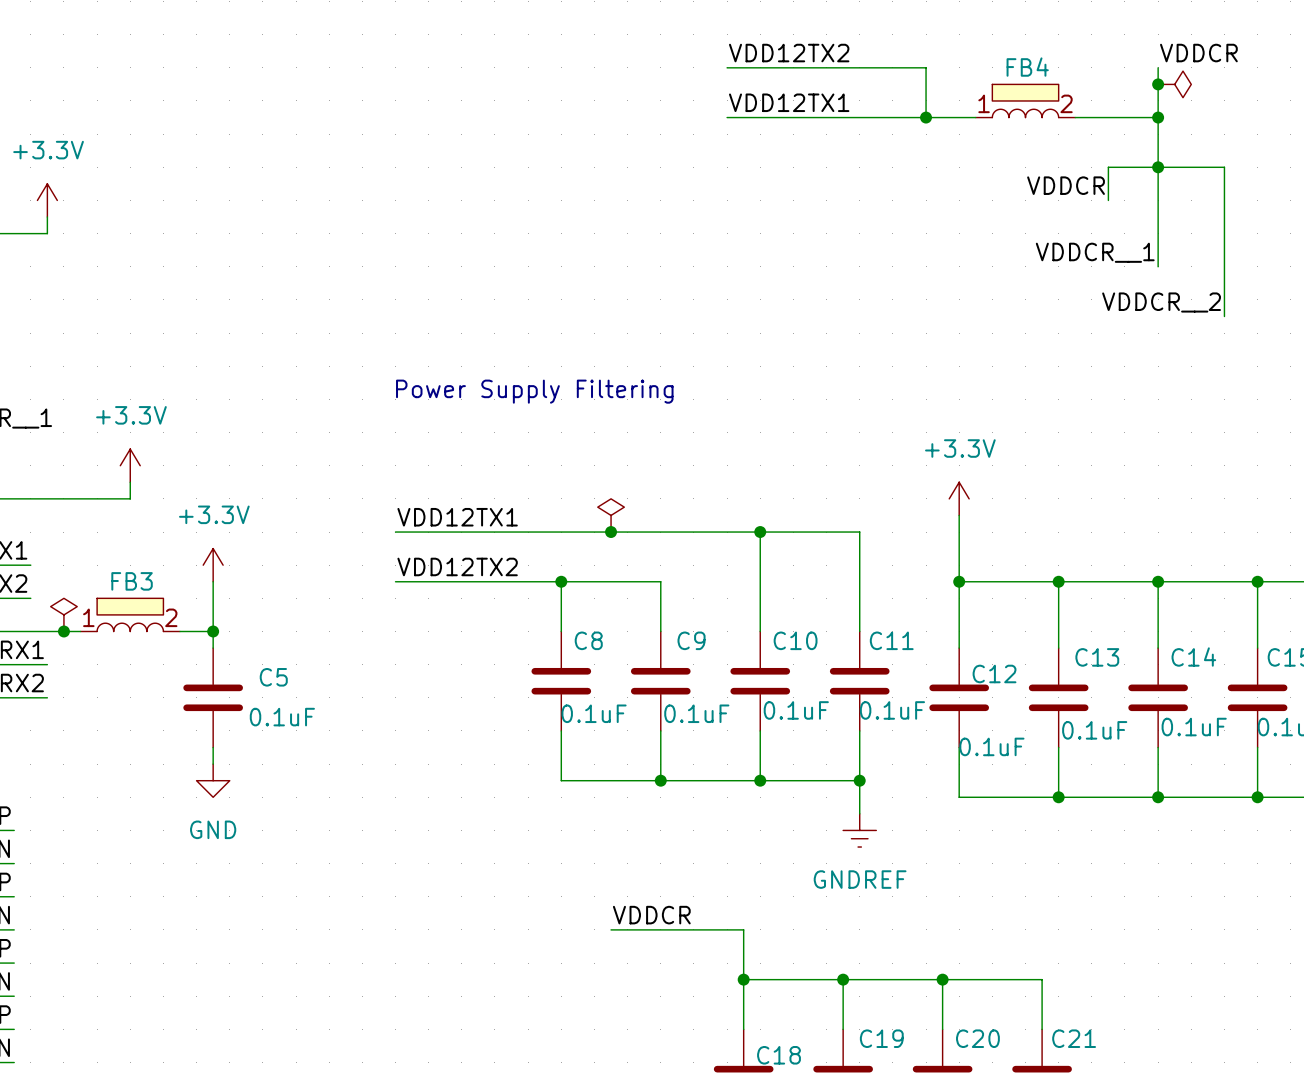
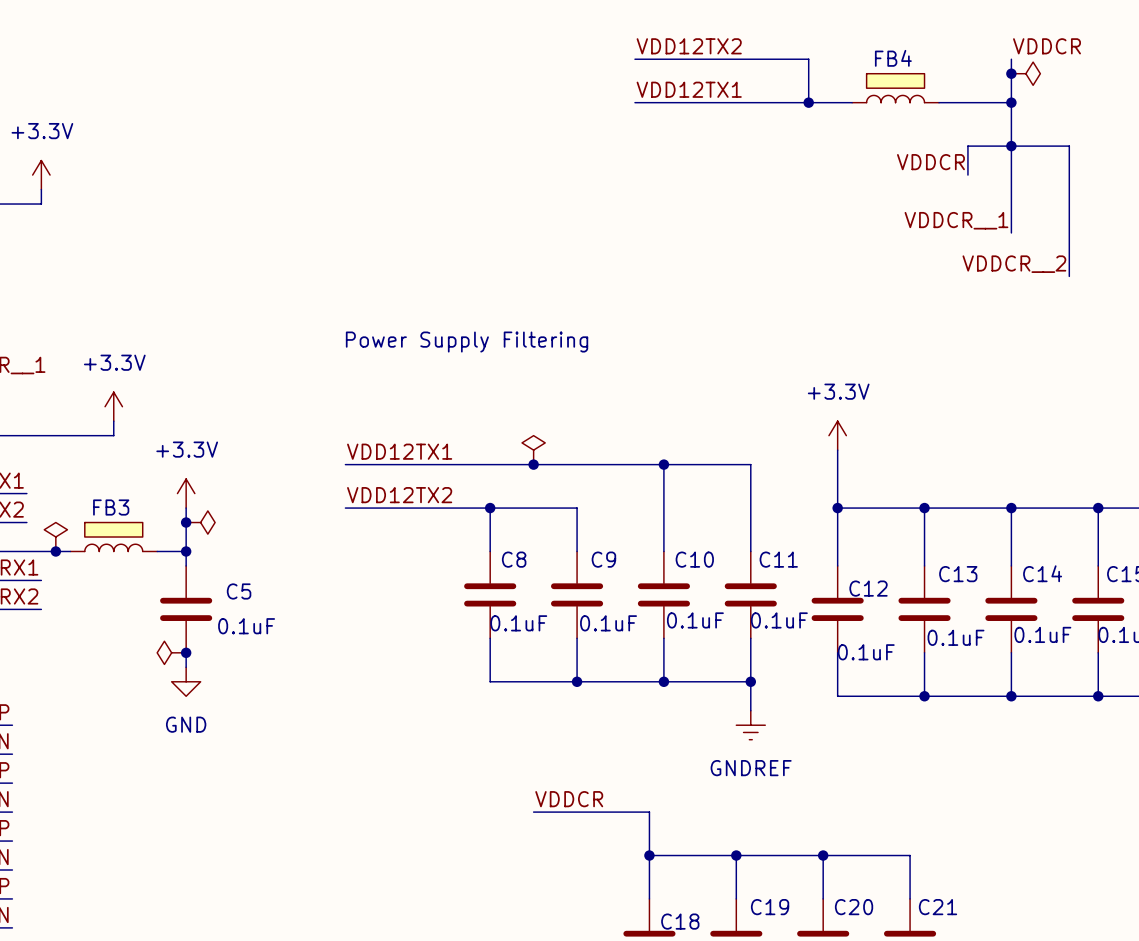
FB4 symbol: [975, 84, 1076, 118] -> [852, 73, 940, 103]
FB3 symbol: [80, 598, 181, 632] -> [70, 522, 158, 552]
junction: none -> (186, 522)
power symbol: none -> (200, 522)
power symbol: none -> (171, 652)
junction: none -> (186, 652)

